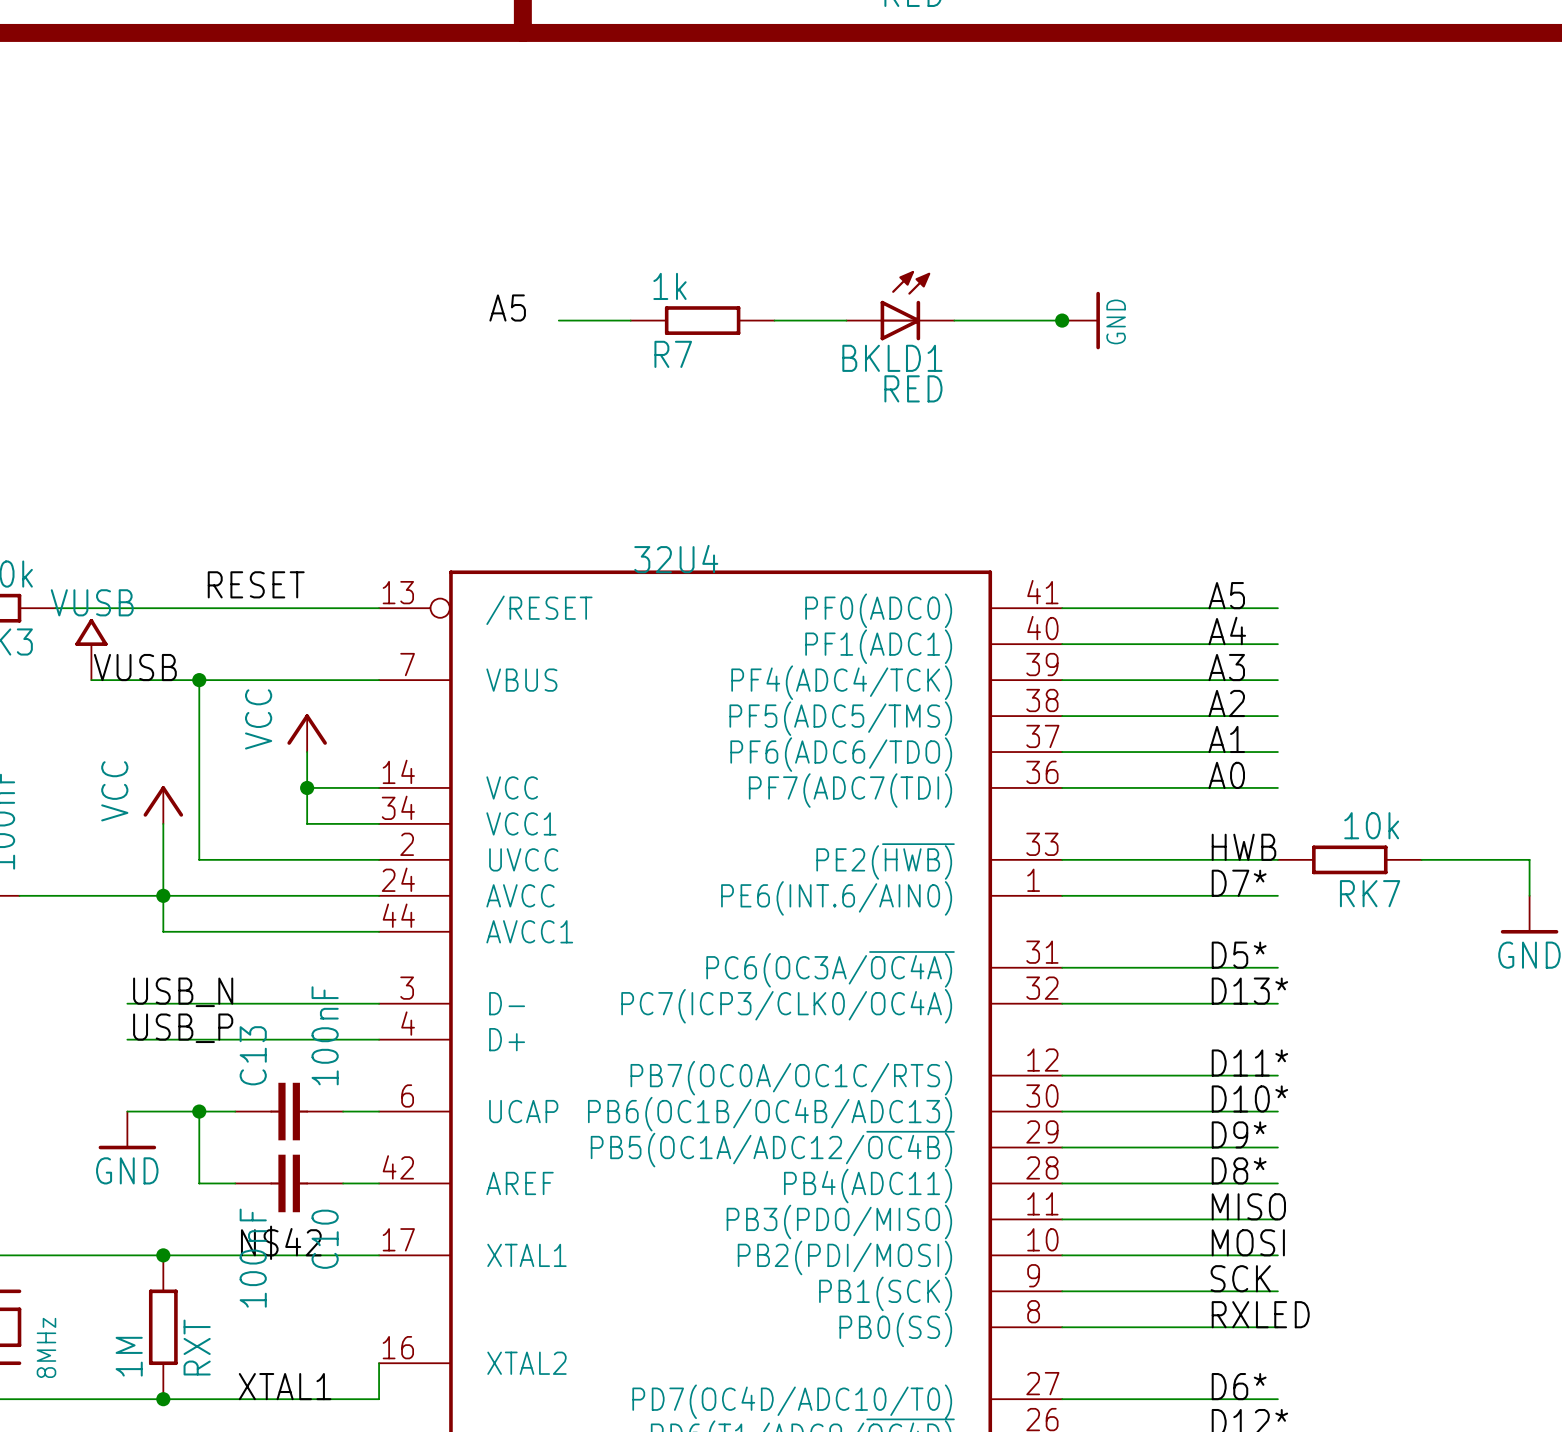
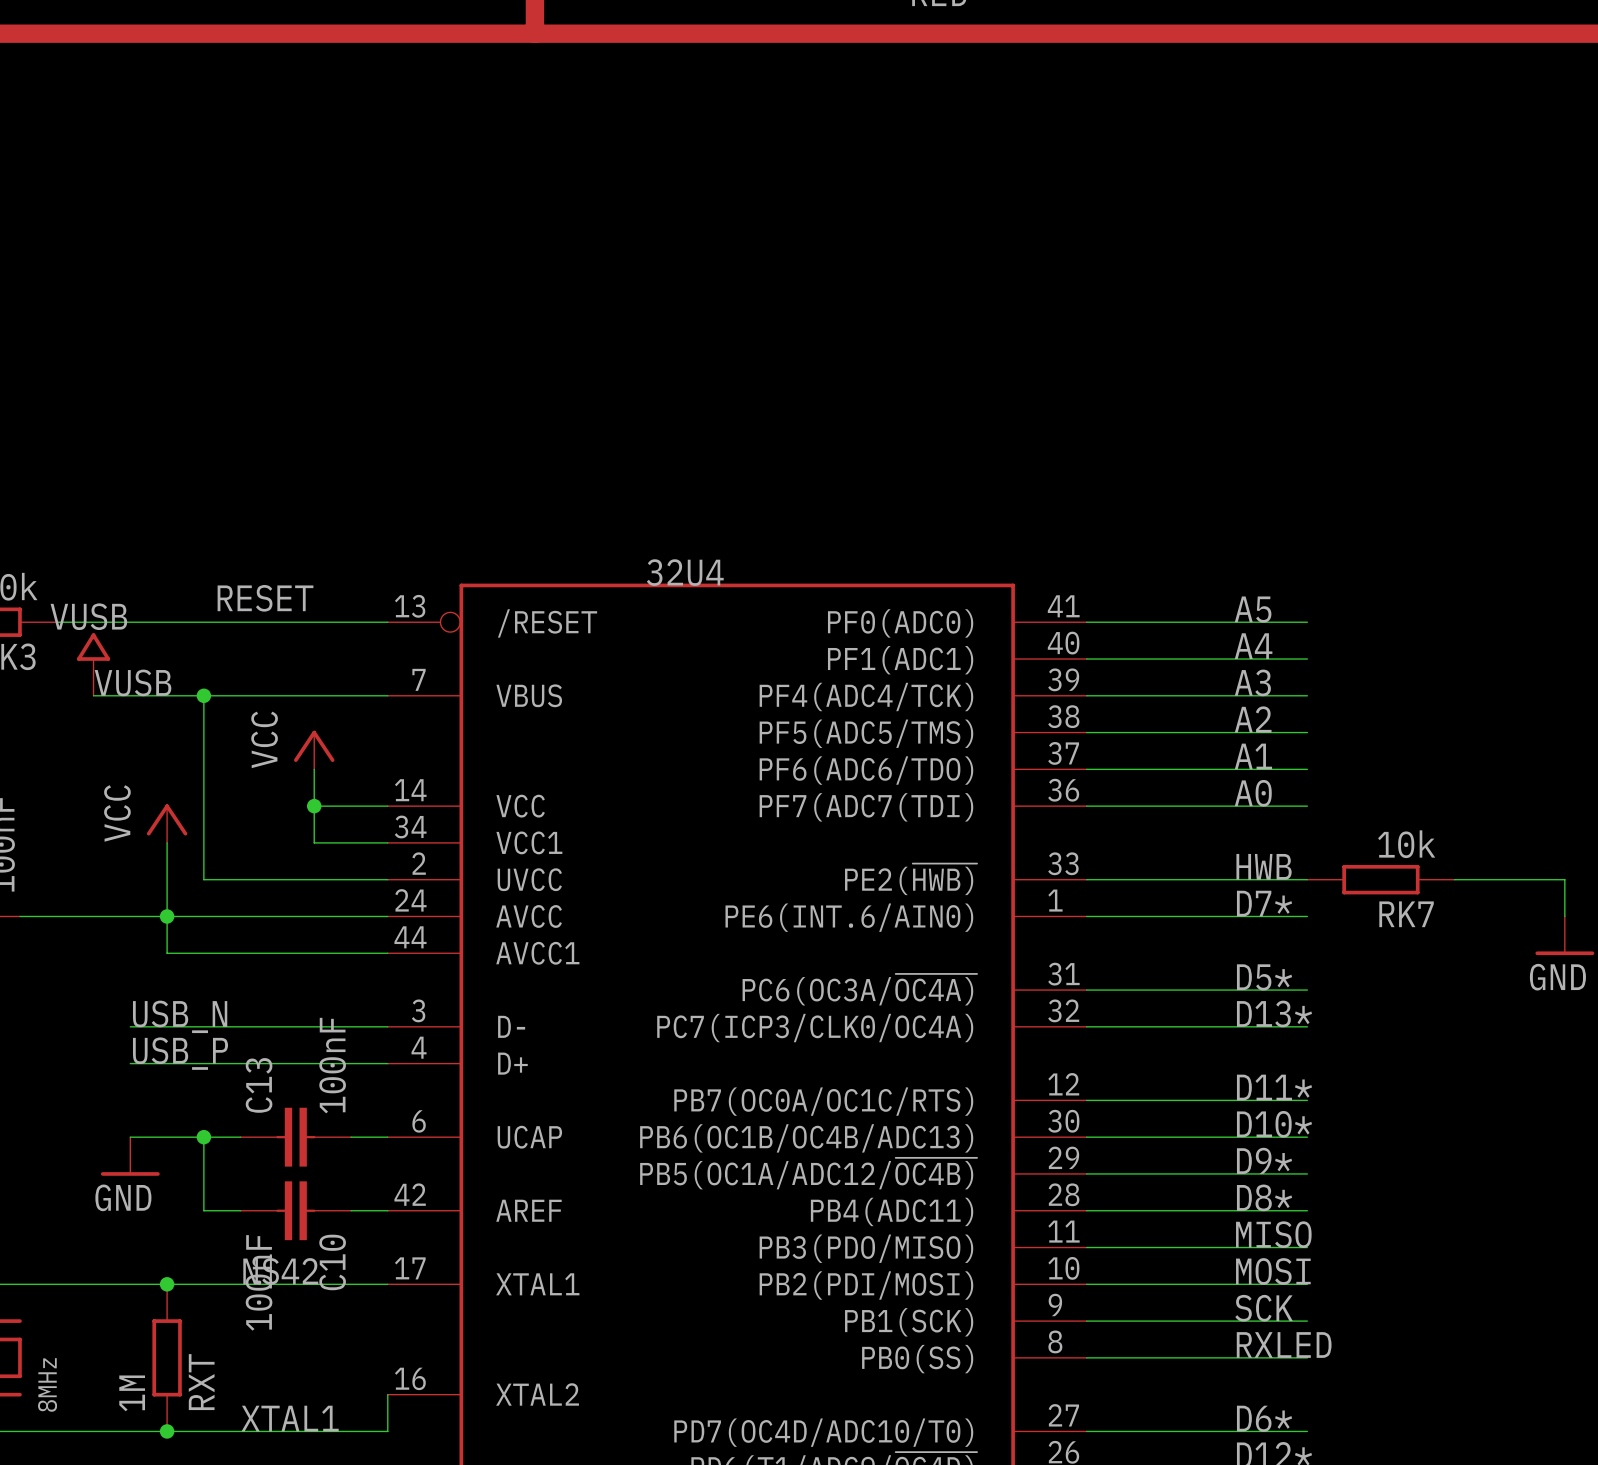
BKLD1: RED (900, 305) -> none
label: A5 (507, 307) -> none
wire: (558, 320) (630, 320) -> none
R7: 1k (702, 320) -> none
wire: (774, 320) (846, 320) -> none
wire: (954, 320) (1062, 320) -> none
junction: (1062, 320) -> none
power symbol: GND (1081, 320) -> none

